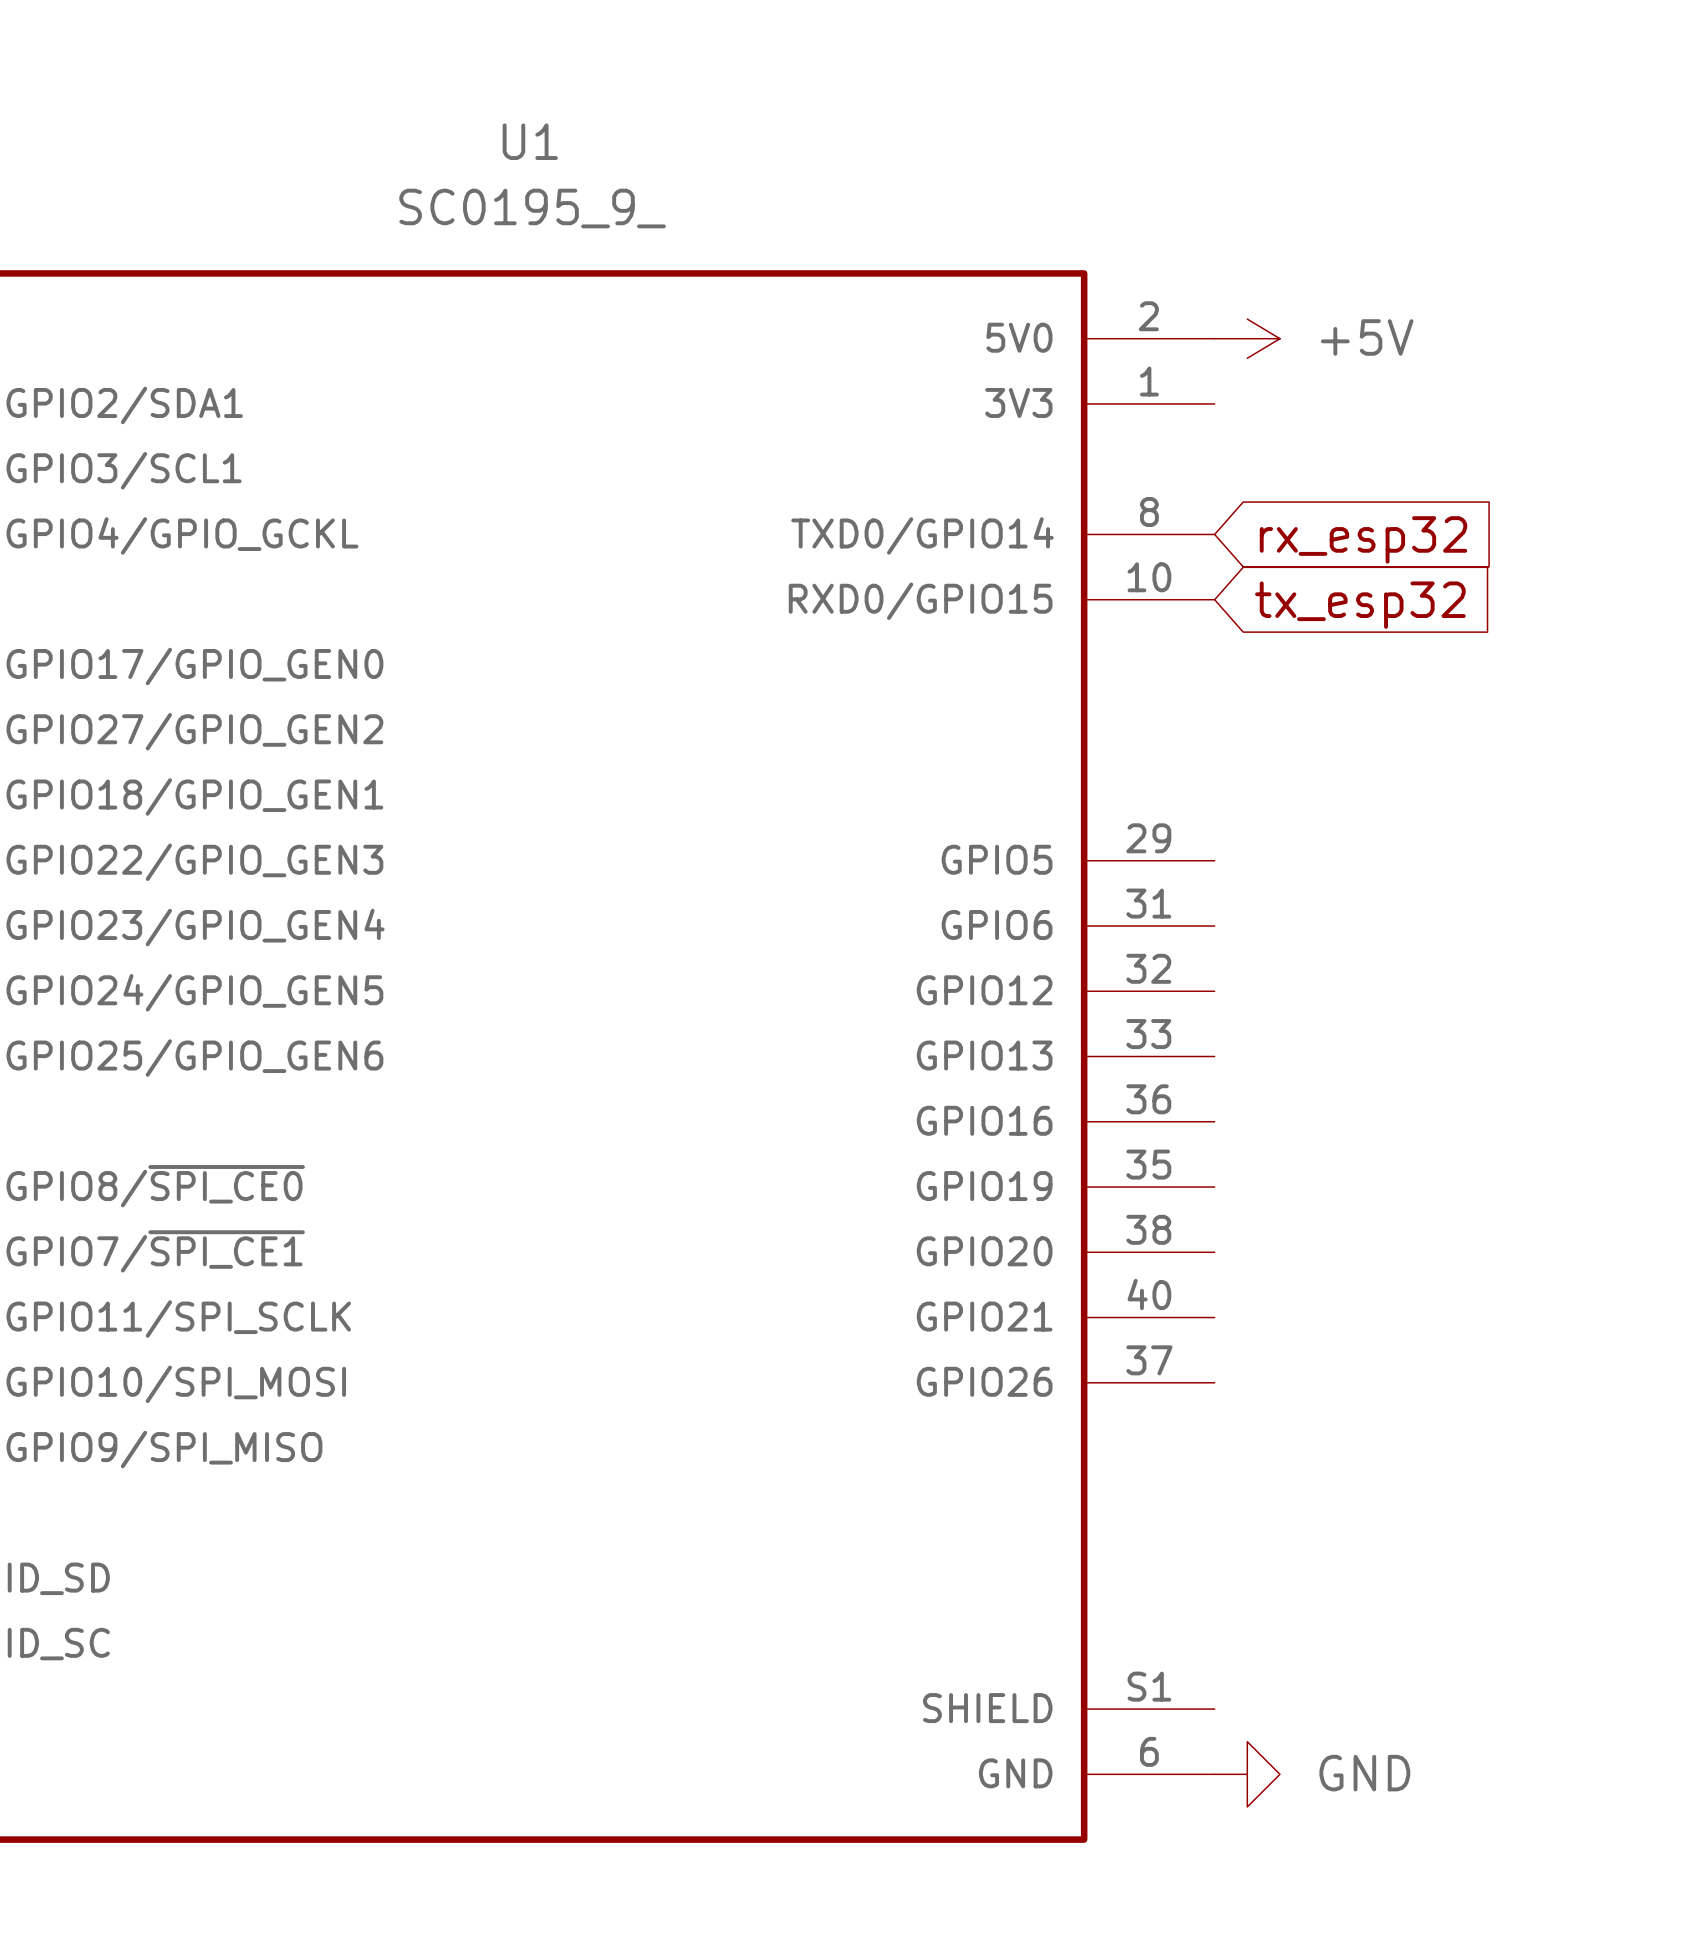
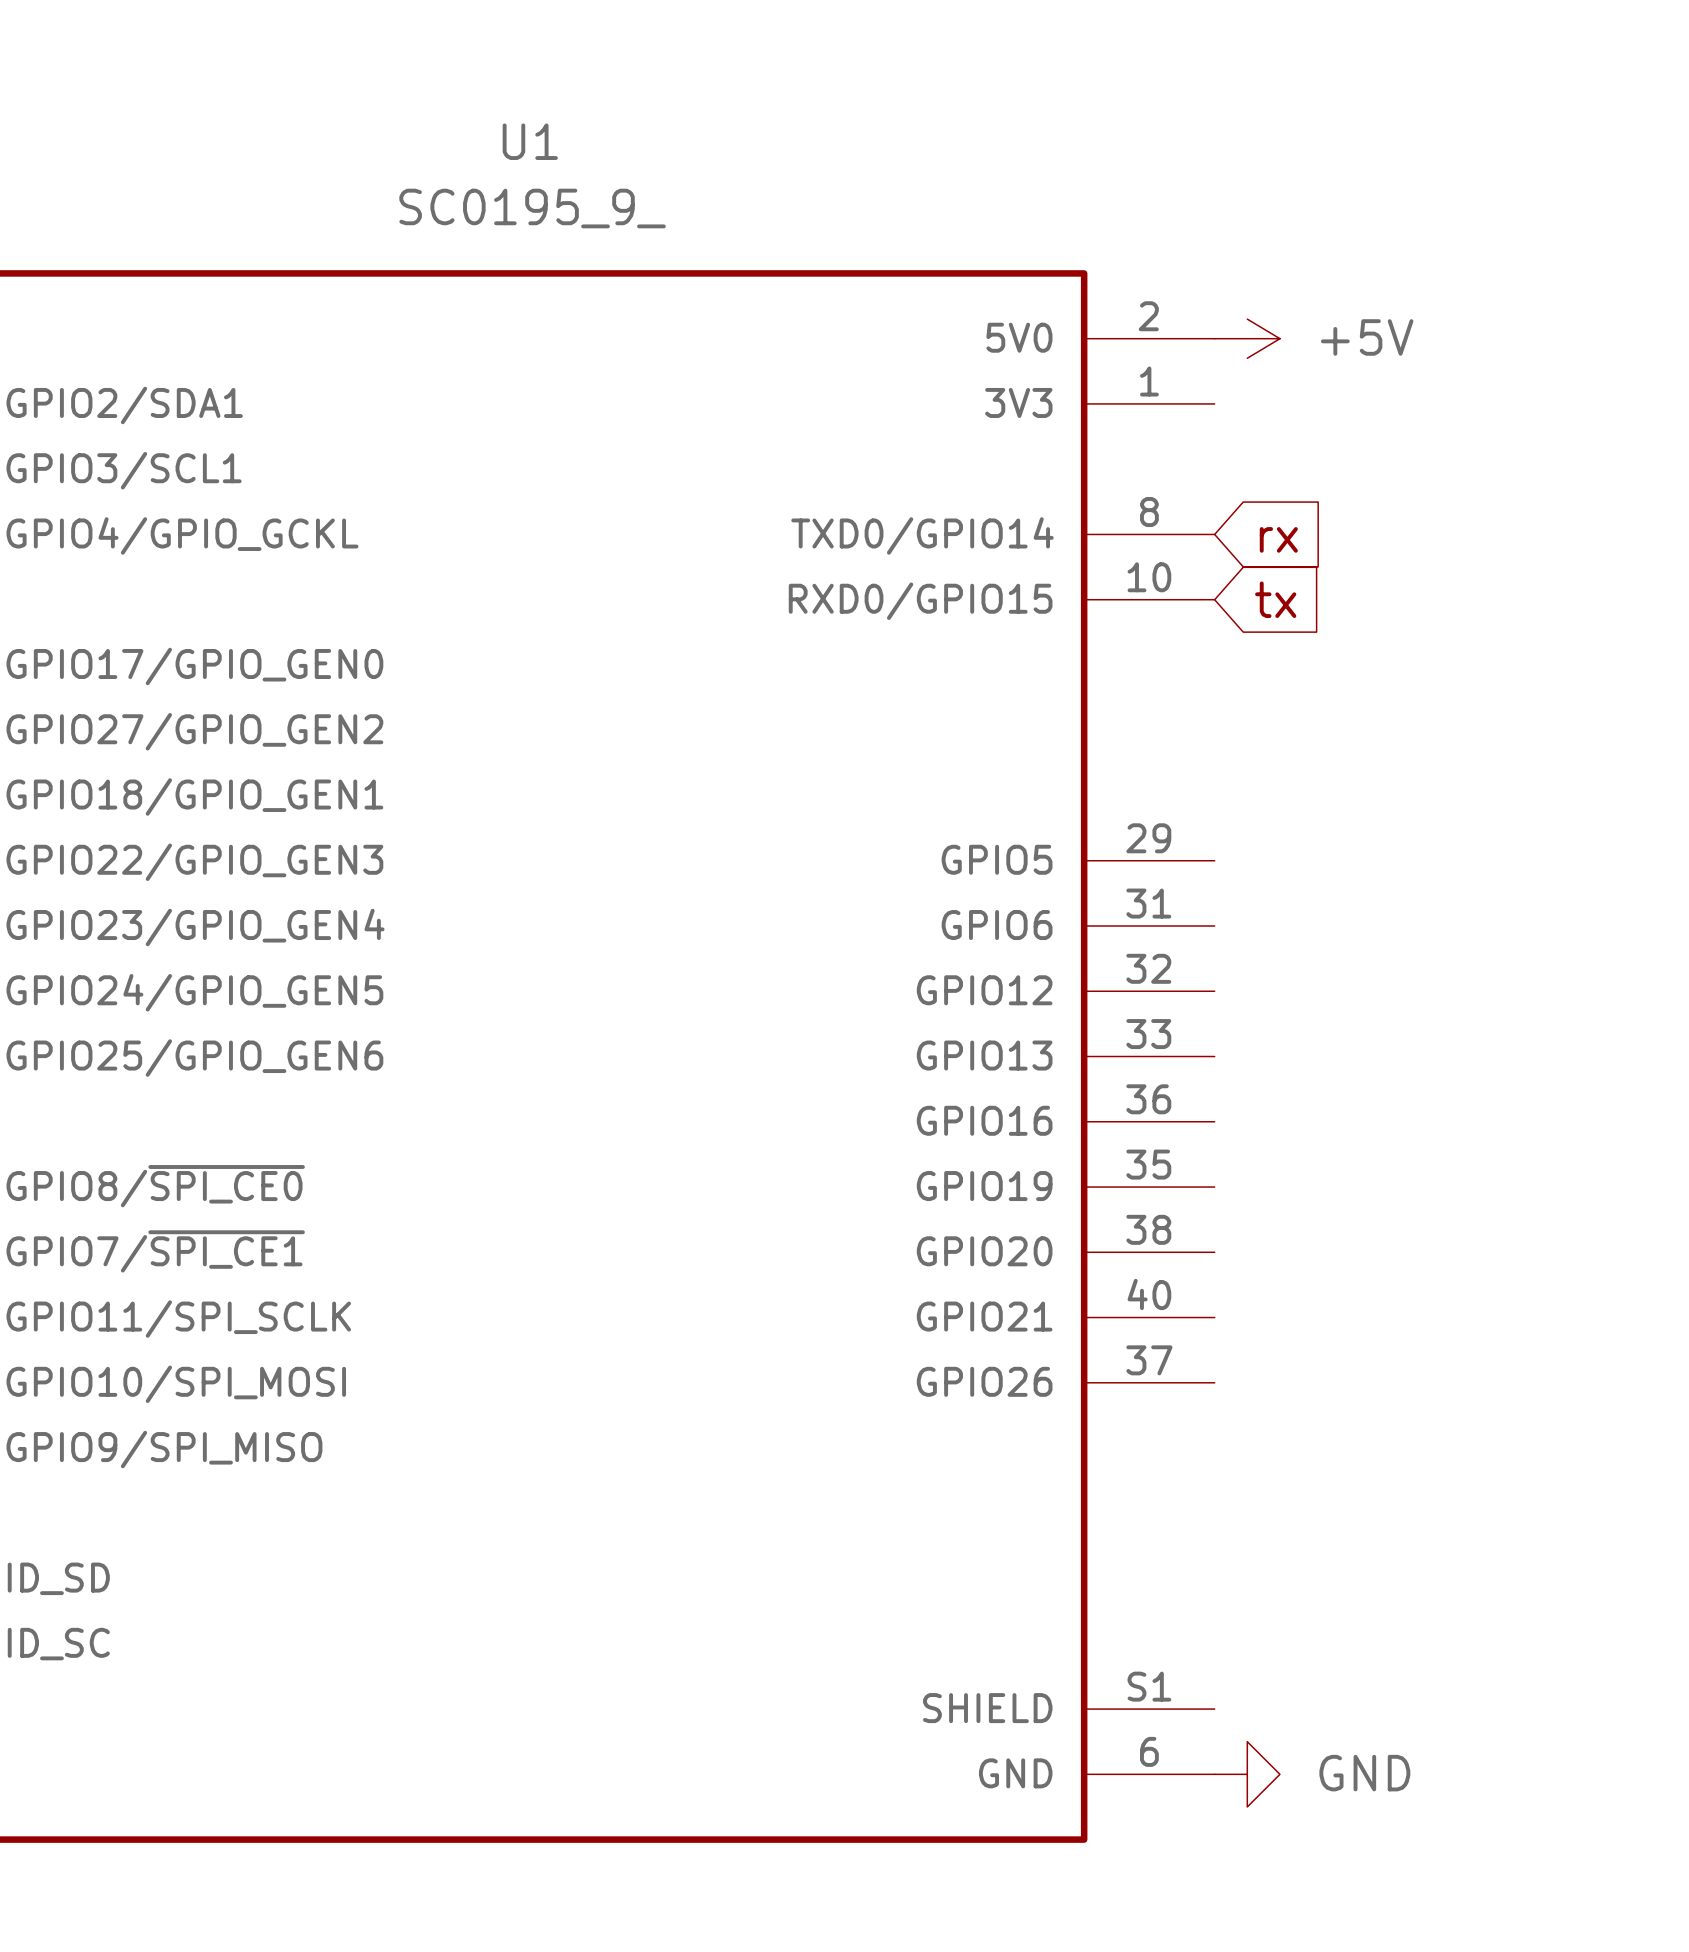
global label: rx_esp32 (1363, 539) -> rx (1278, 539)
global label: tx_esp32 (1360, 605) -> tx (1275, 599)

